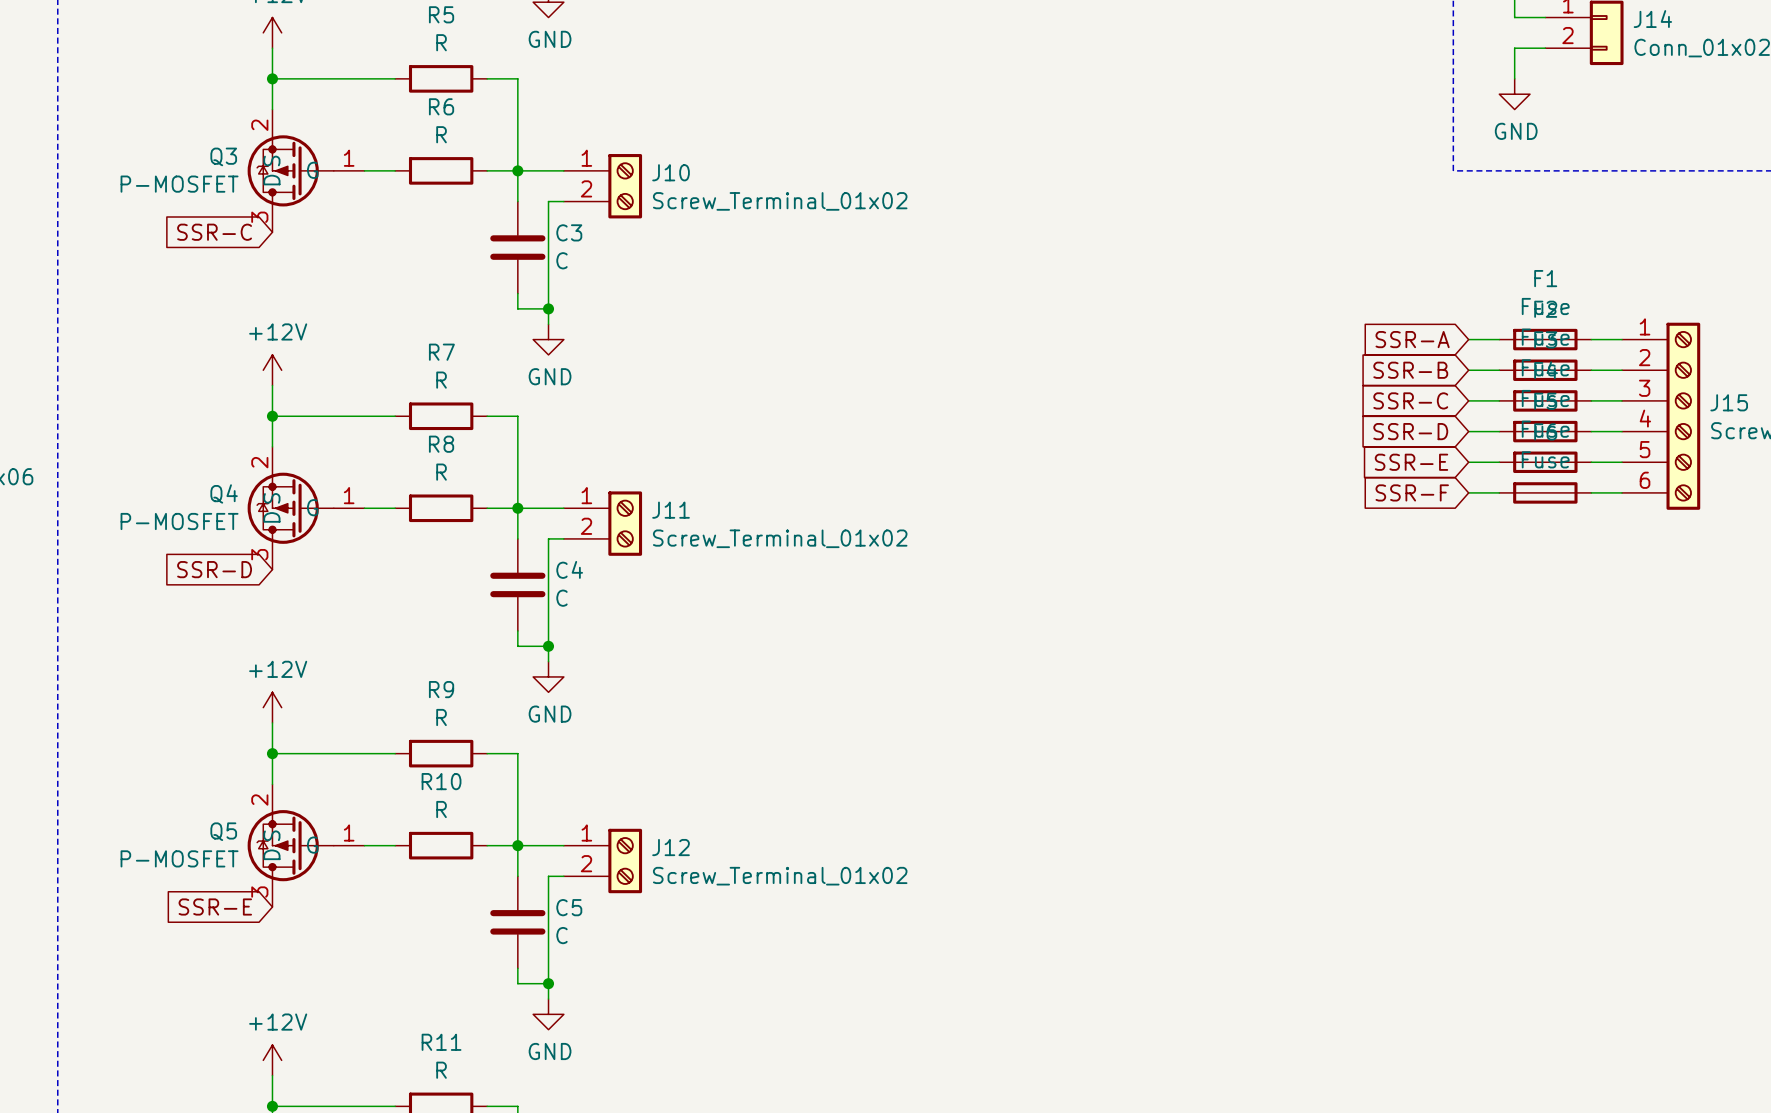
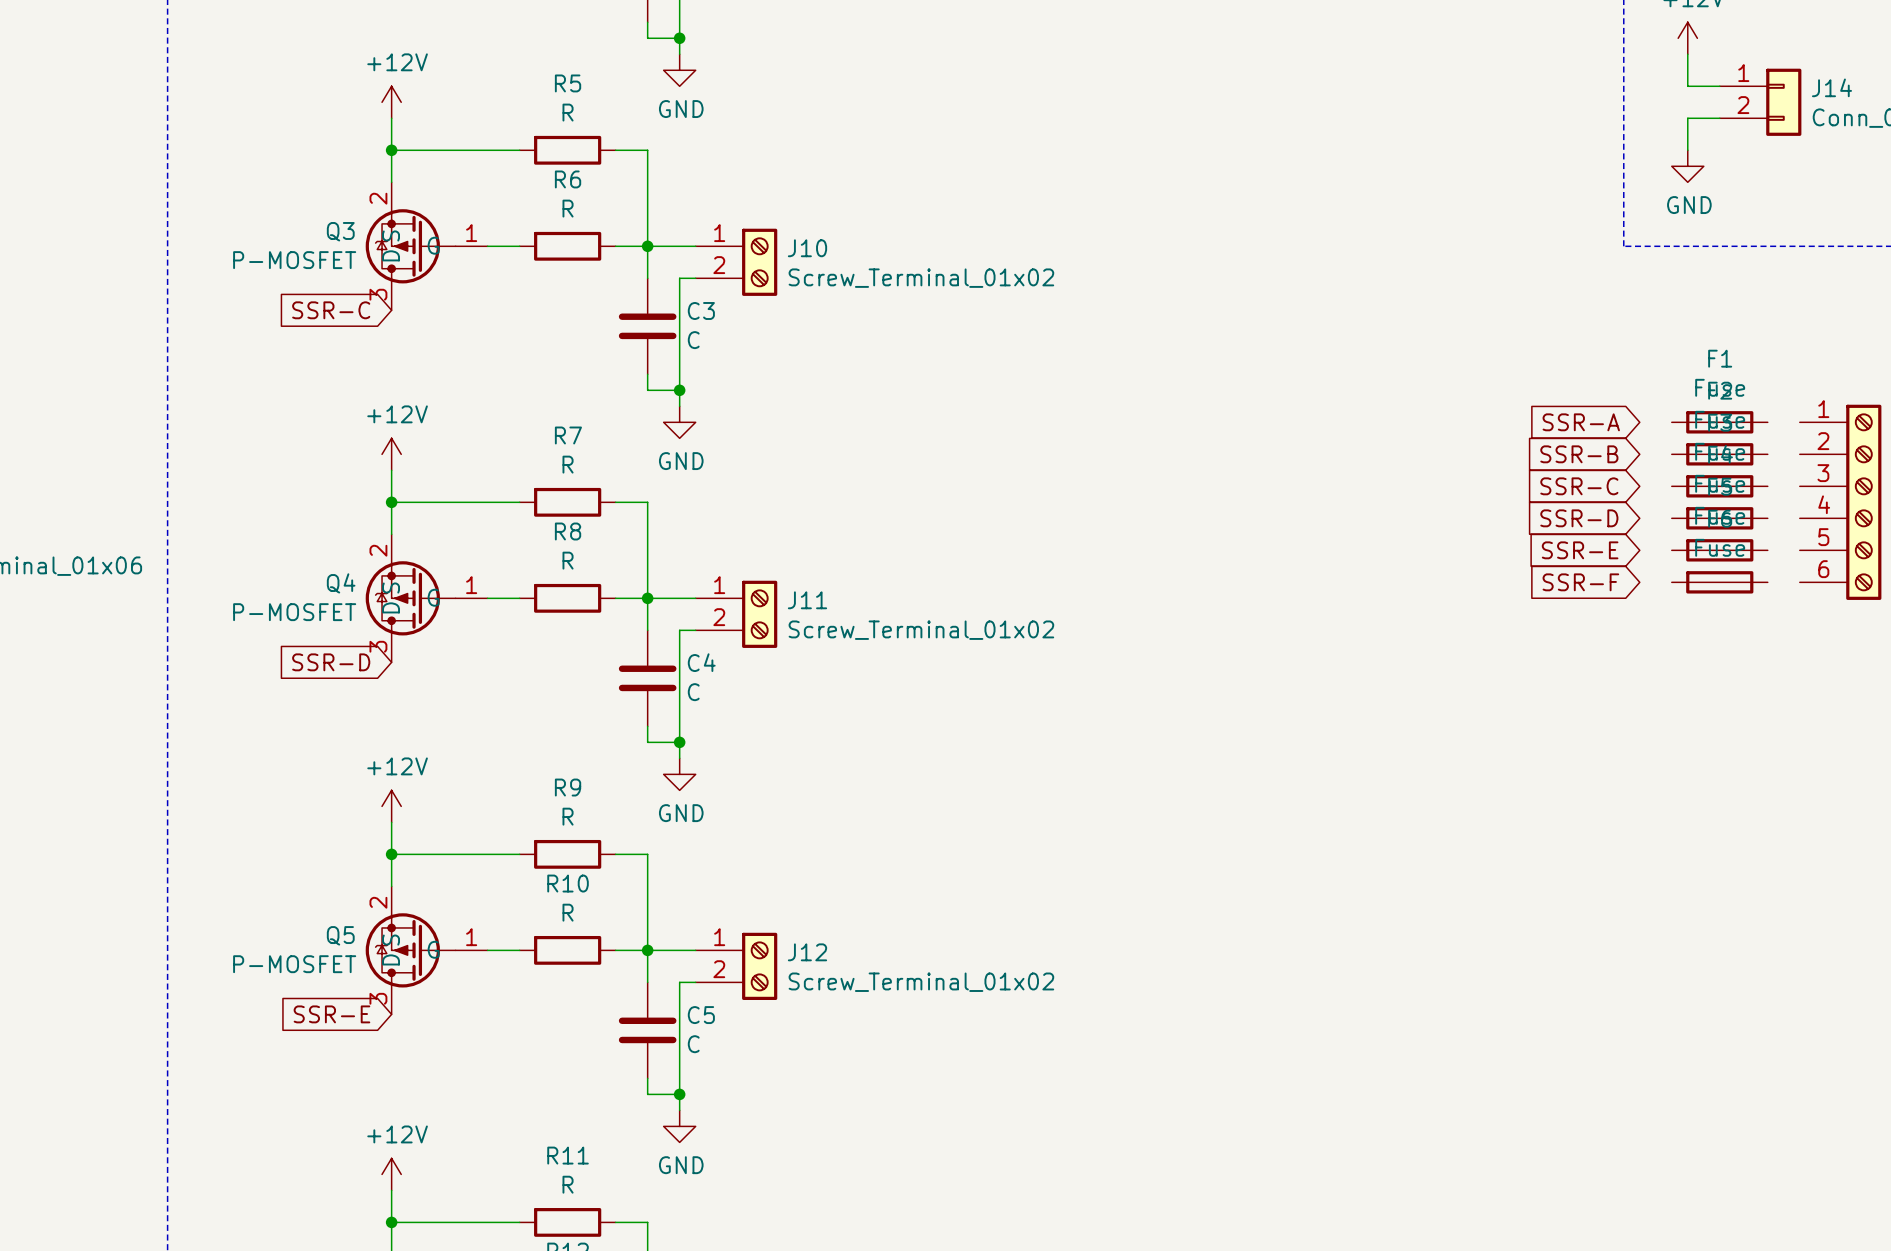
wire: (1468, 339) (1499, 339) -> none
wire: (1591, 339) (1622, 339) -> none
wire: (1468, 370) (1499, 370) -> none
wire: (1591, 370) (1622, 370) -> none
wire: (1468, 400) (1499, 400) -> none
wire: (1591, 400) (1622, 400) -> none
wire: (1468, 431) (1499, 431) -> none
wire: (1591, 431) (1622, 431) -> none
wire: (1468, 462) (1499, 462) -> none
wire: (1591, 462) (1622, 462) -> none
wire: (1468, 492) (1499, 492) -> none
wire: (1591, 492) (1622, 492) -> none

